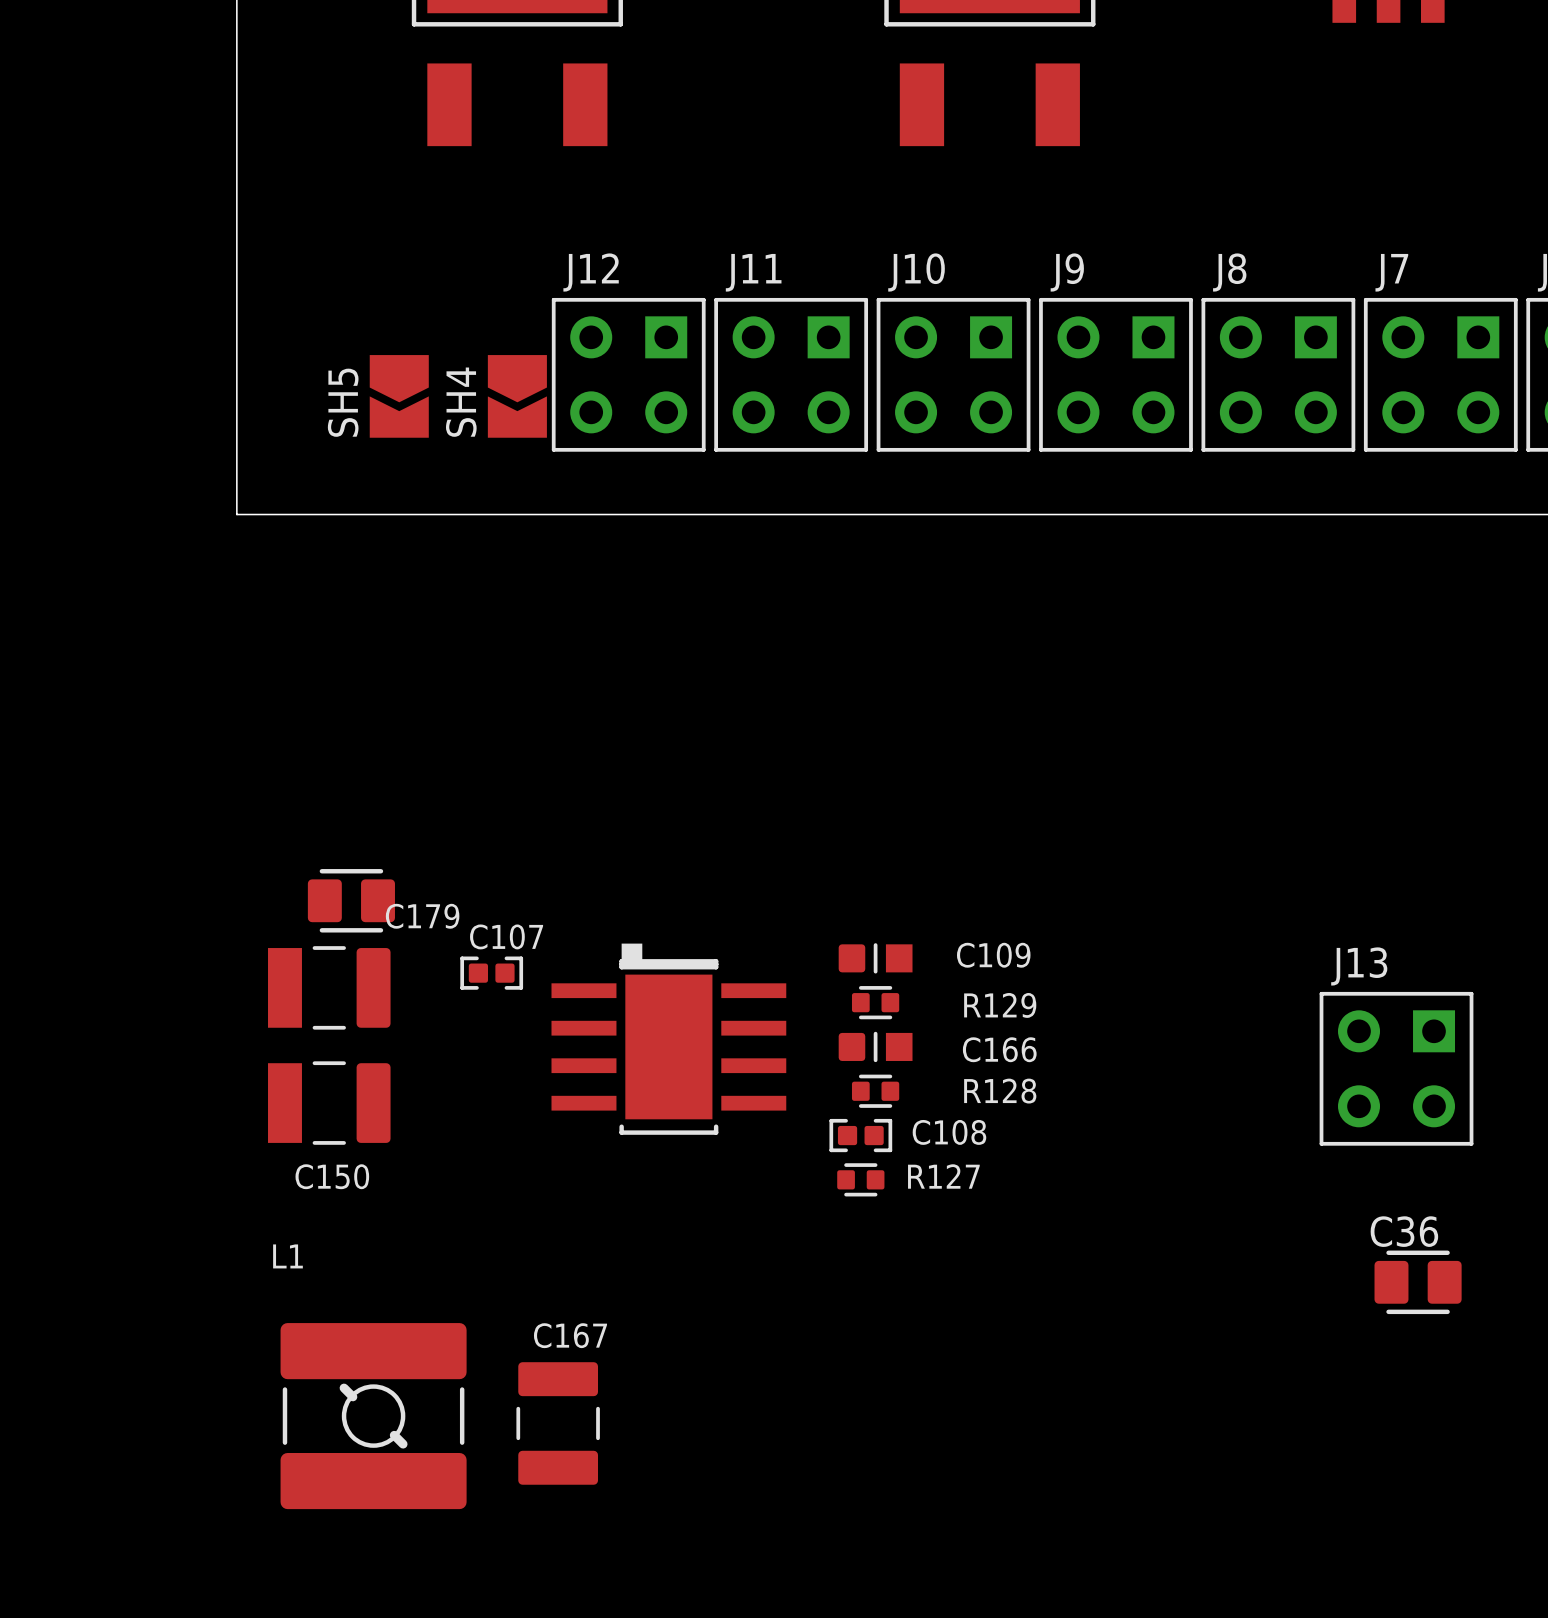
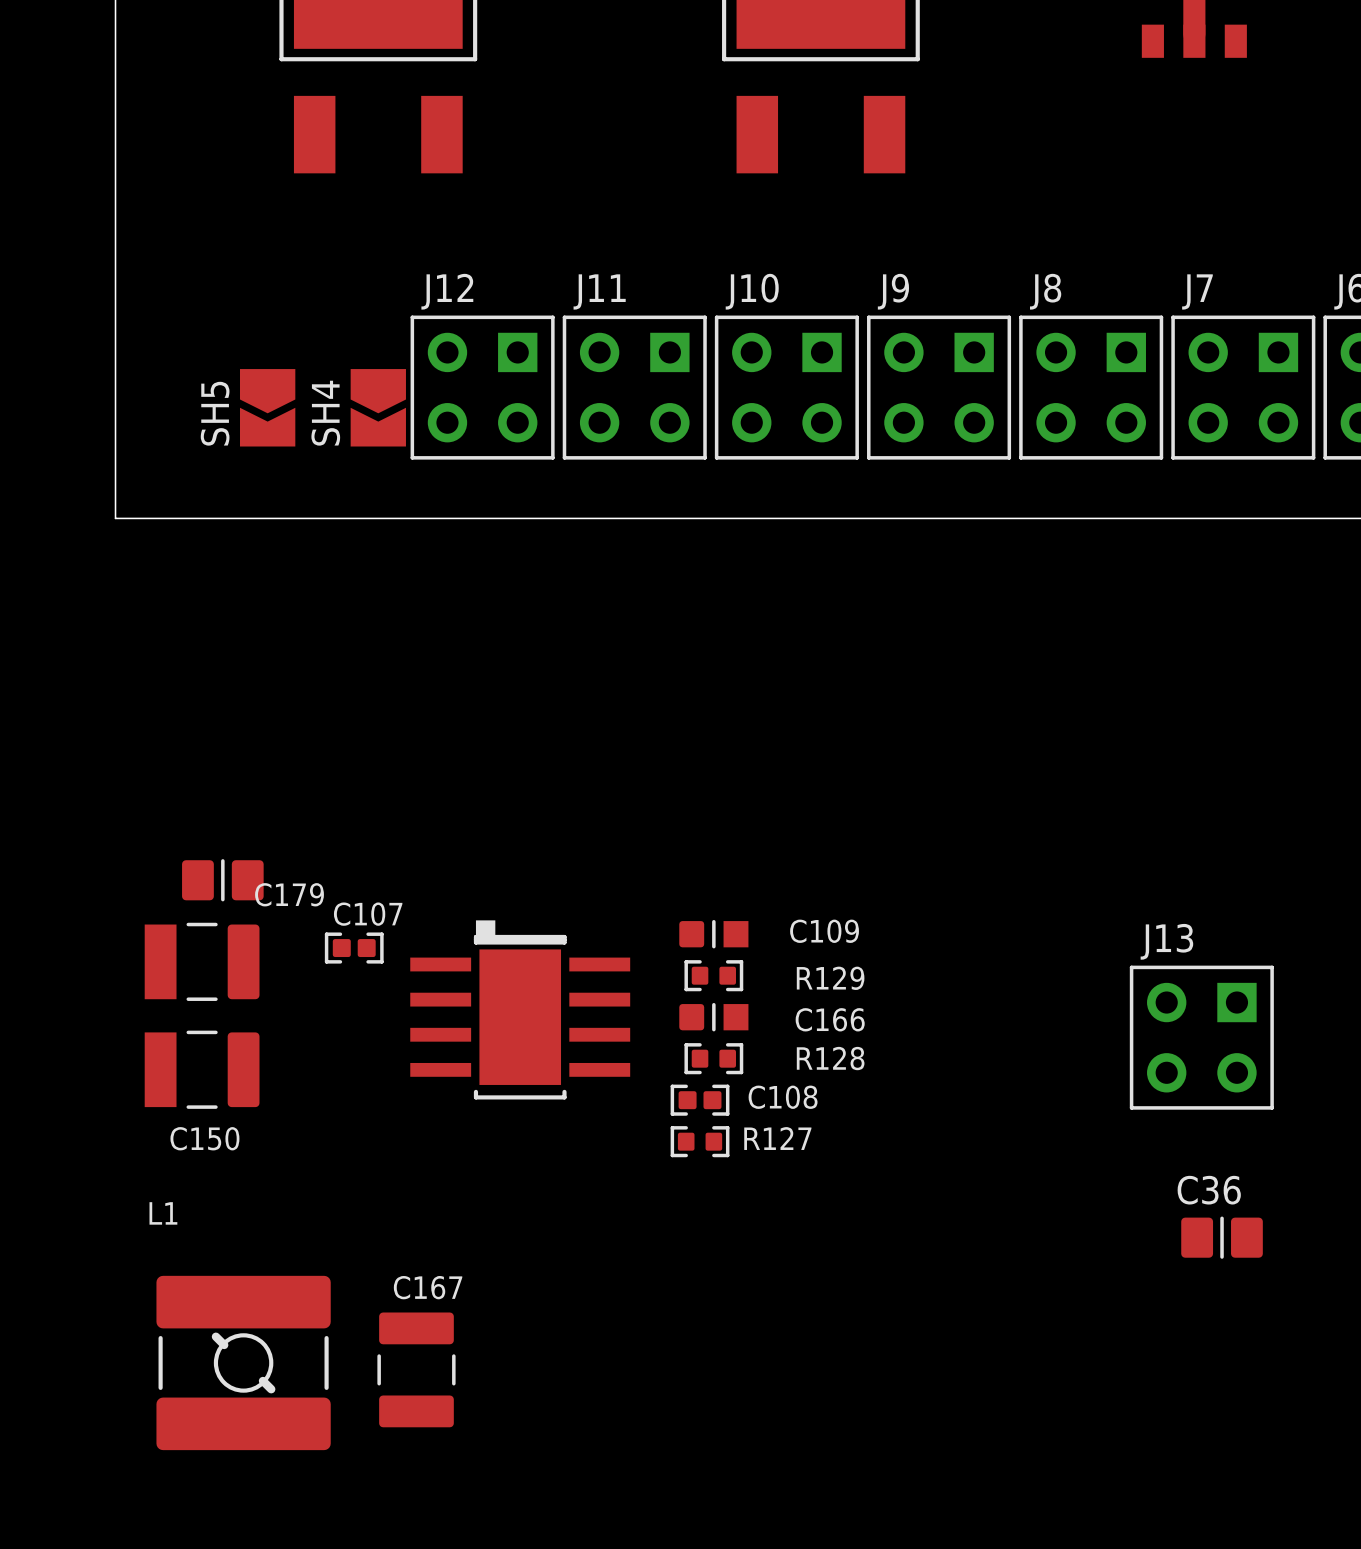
part footprint: [307, 869, 395, 933] -> [182, 859, 264, 902]
R129 footprint: [851, 986, 900, 1020] -> [684, 960, 744, 992]
R128 footprint: [851, 1074, 900, 1108] -> [684, 1043, 744, 1075]
R127 footprint: [837, 1163, 885, 1197] -> [670, 1126, 730, 1158]
C36 footprint: [1374, 1250, 1462, 1315] -> [1181, 1216, 1263, 1259]

